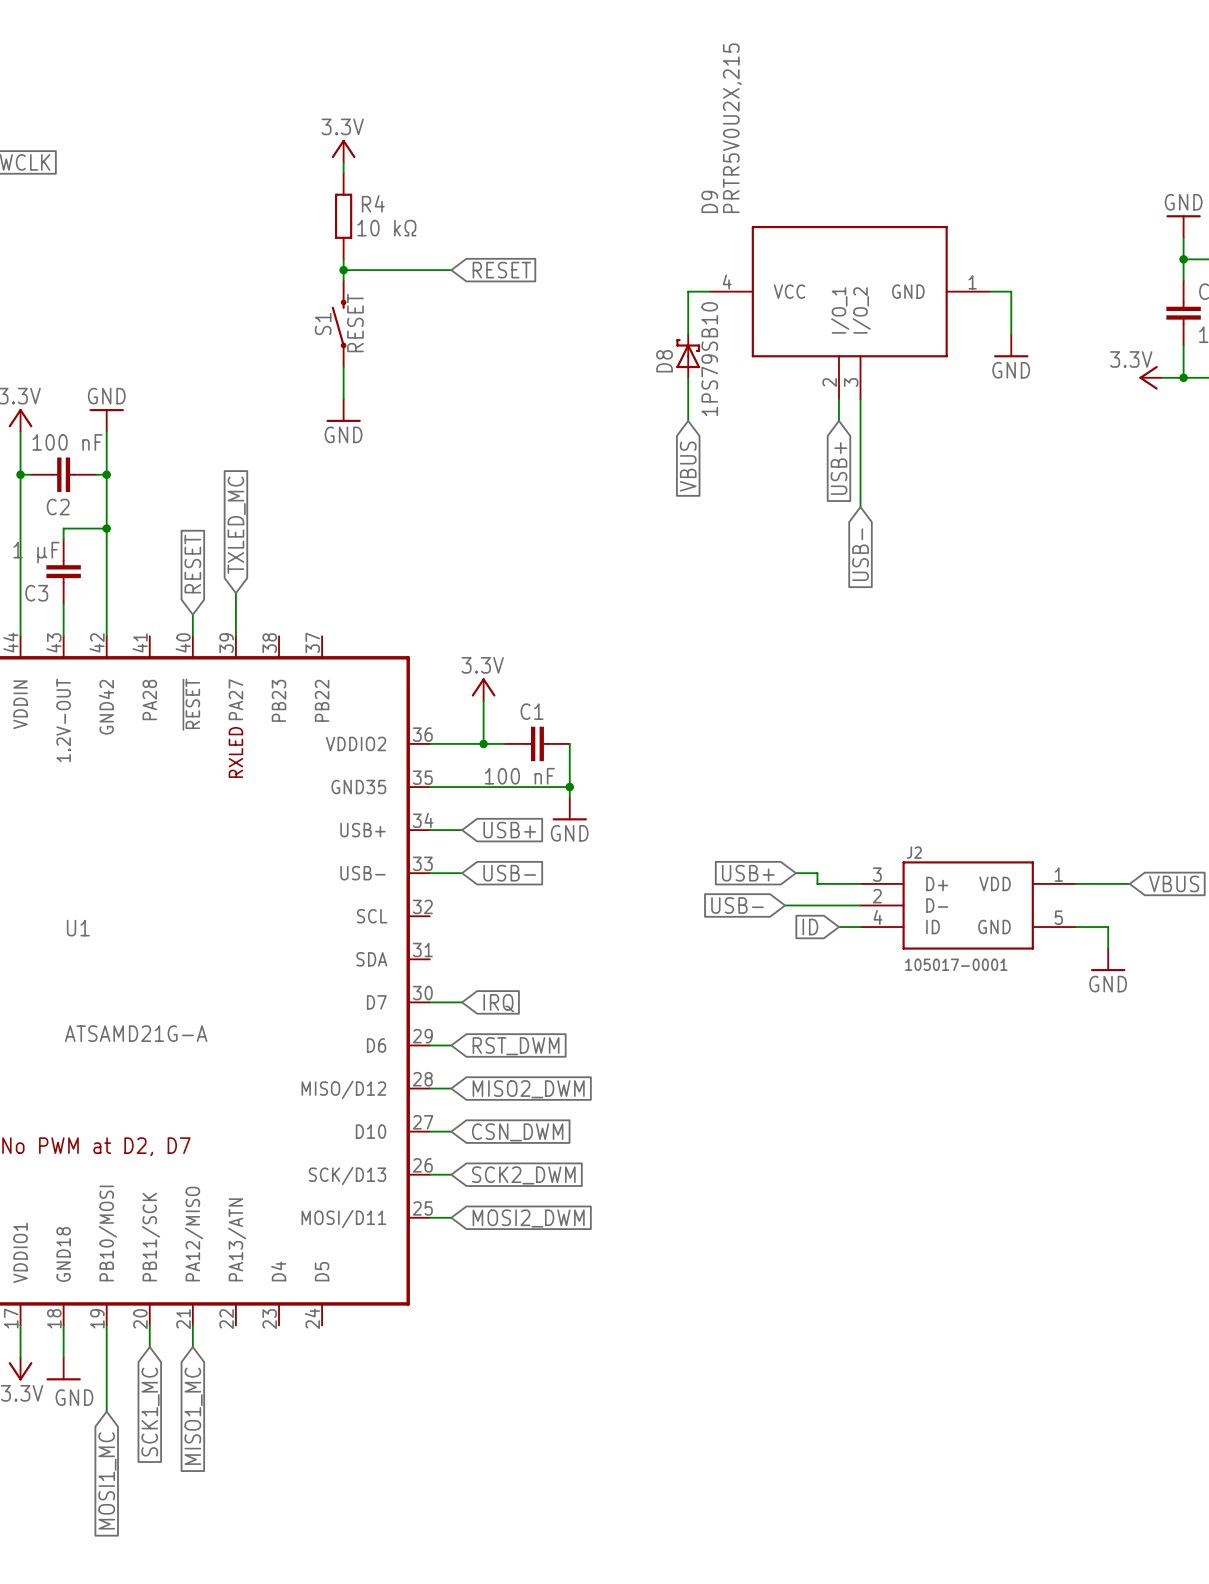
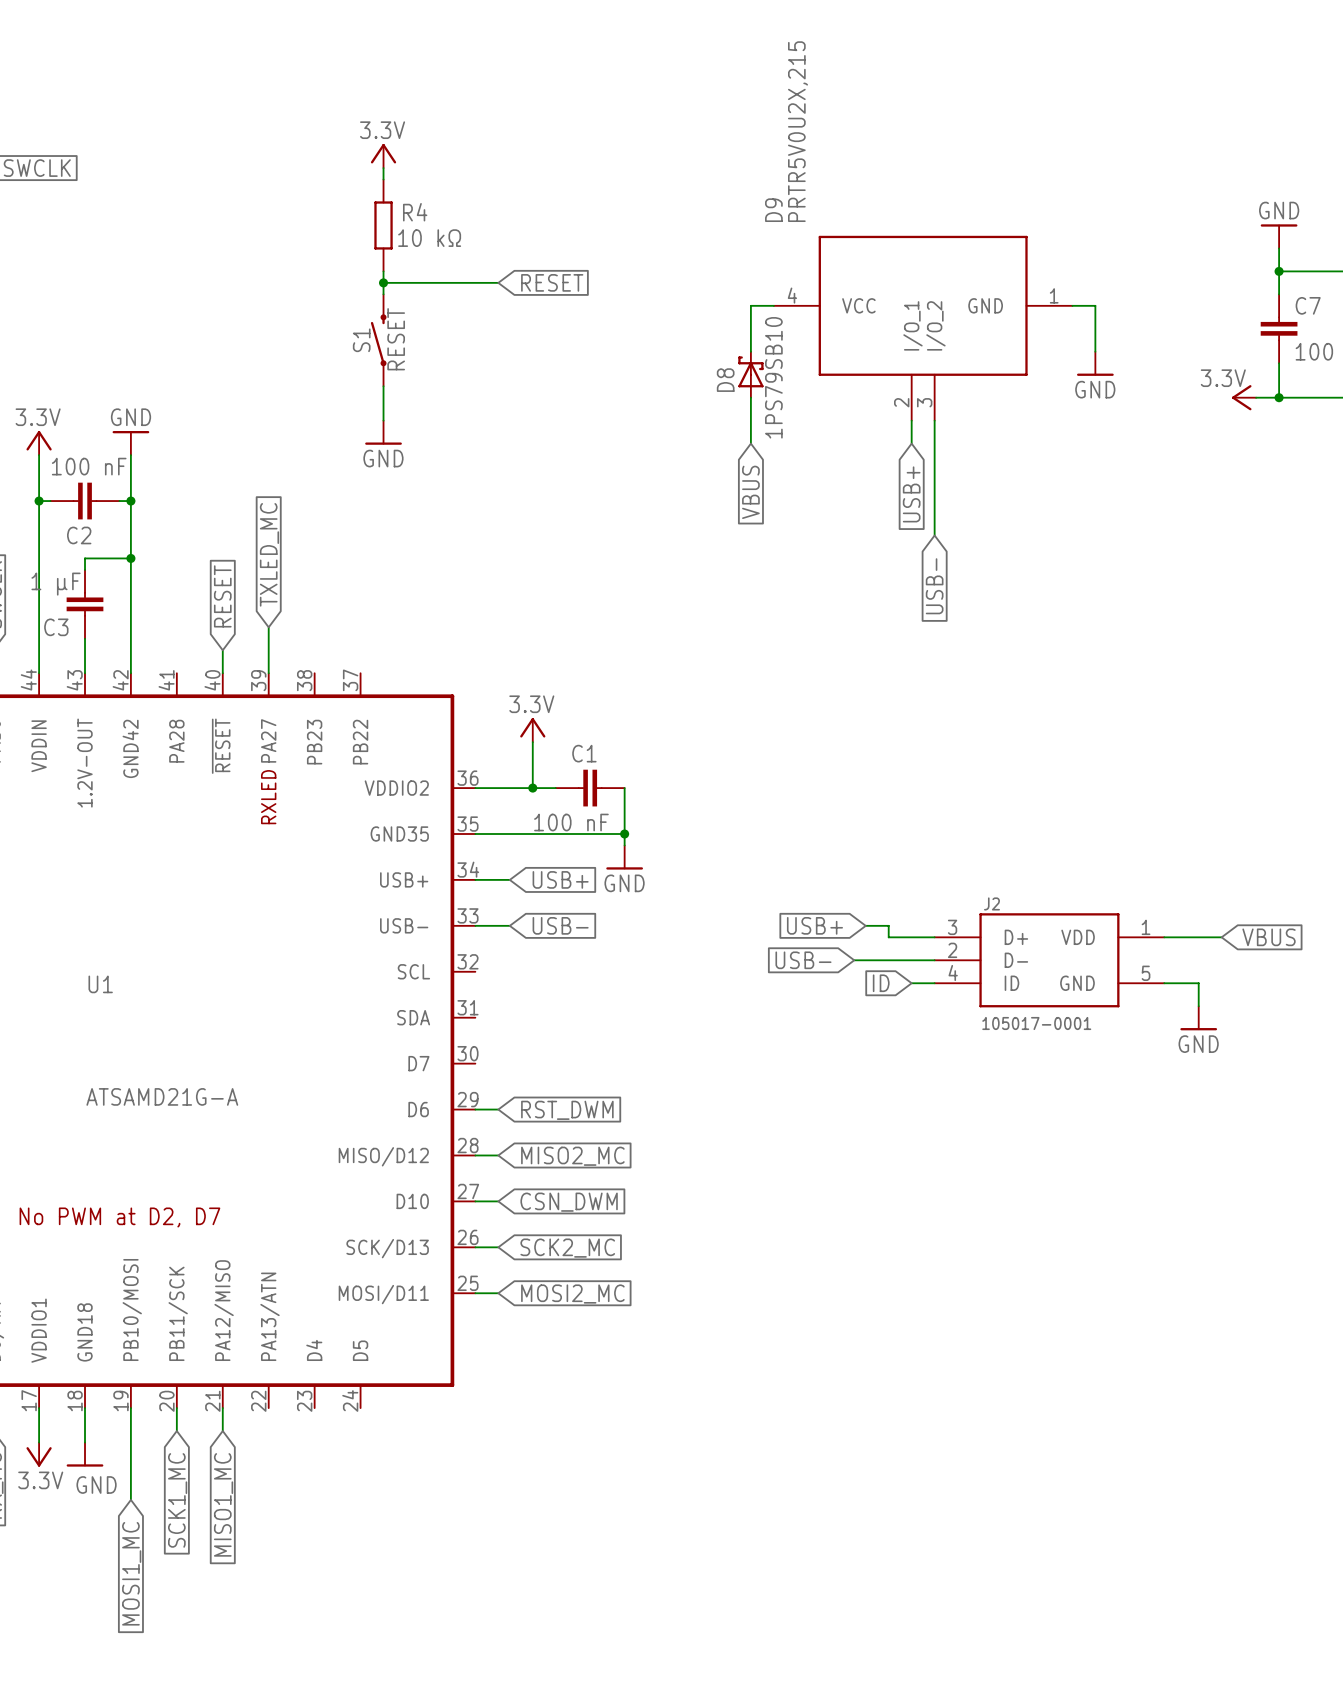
wire: (429, 1002) (462, 1002) -> none
global label: IRQ (498, 1003) -> none
global label: MISO2_DWM (528, 1089) -> MISO2_MC (572, 1156)
global label: SCK2_DWM (523, 1175) -> SCK2_MC (567, 1248)
global label: MOSI2_DWM (528, 1218) -> MOSI2_MC (572, 1294)

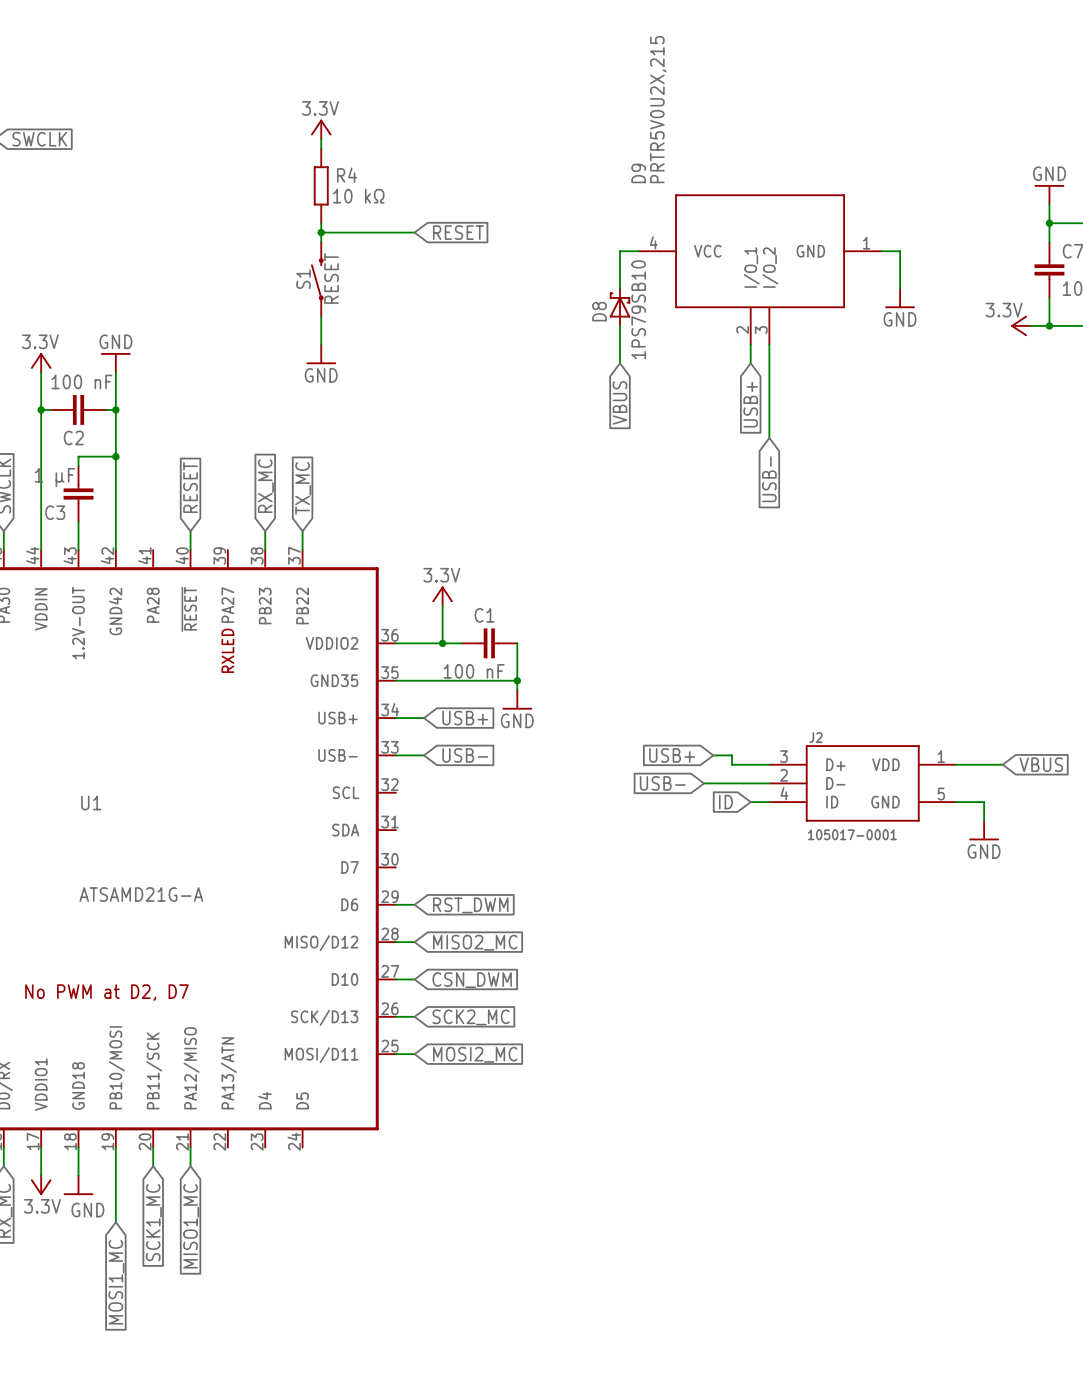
global label: TXLED_MC (269, 554) -> none
global label: none -> RX_MC (265, 486)
global label: none -> TX_MC (303, 488)
wire: (268, 627) (268, 673) -> none
wire: none -> (265, 531) (265, 550)
wire: none -> (302, 531) (302, 550)

